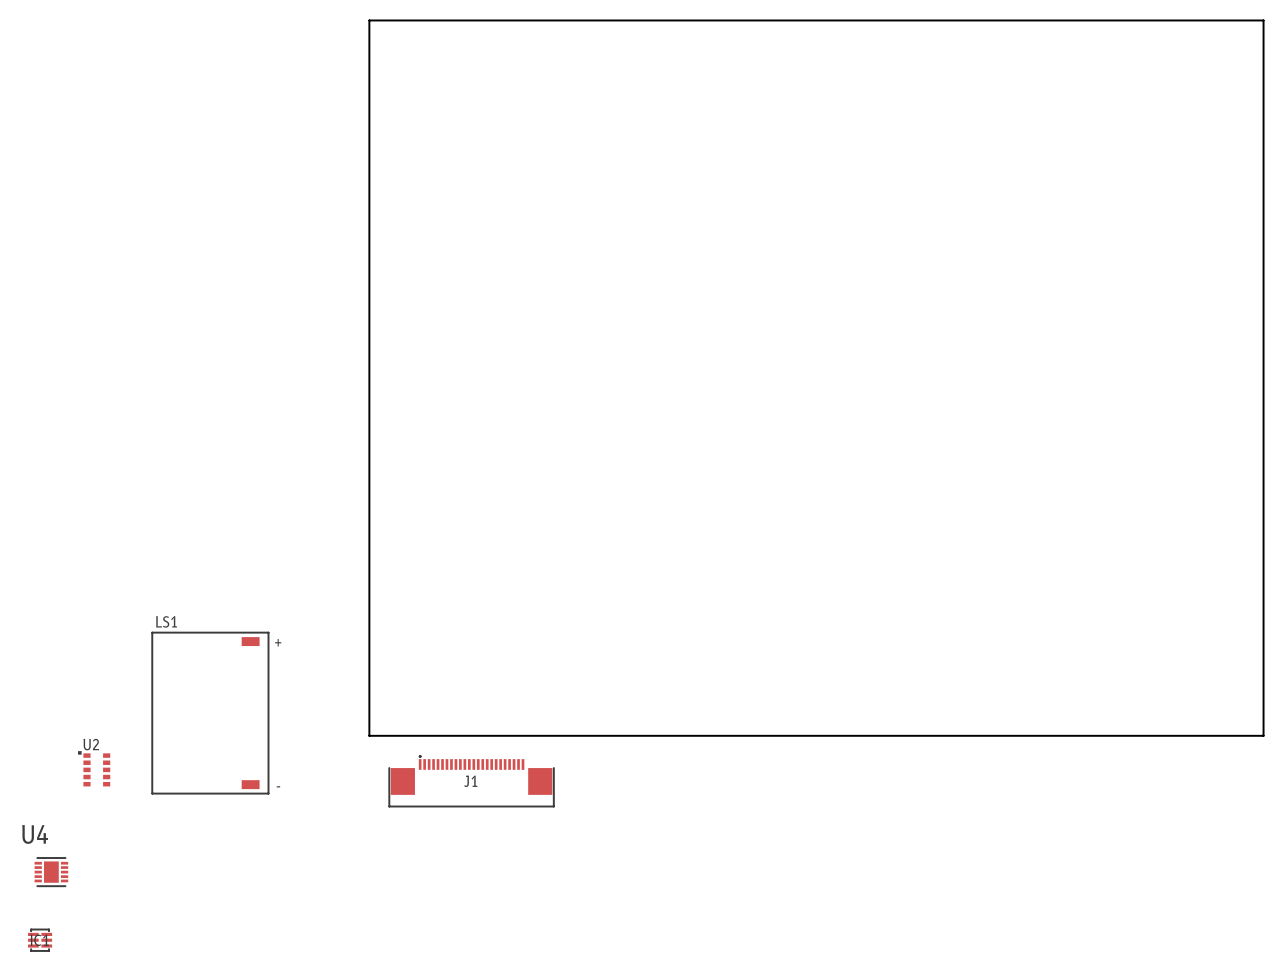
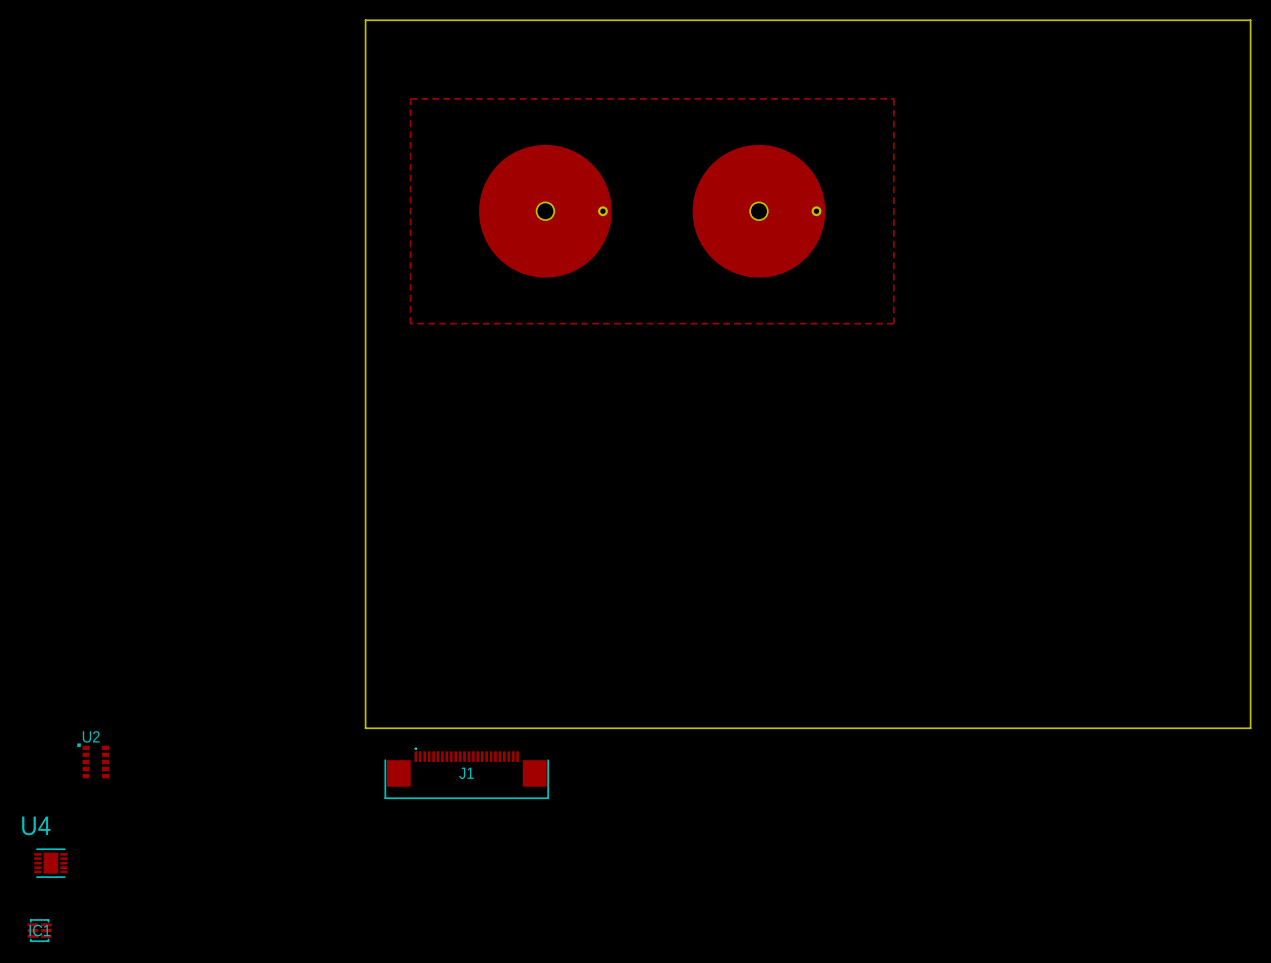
top zone outline: none -> (410, 98) (893, 98) (893, 323) (410, 323) (410, 98)
part: none -> (545, 211)
part: none -> (758, 211)
LS1: (210, 713) -> none

